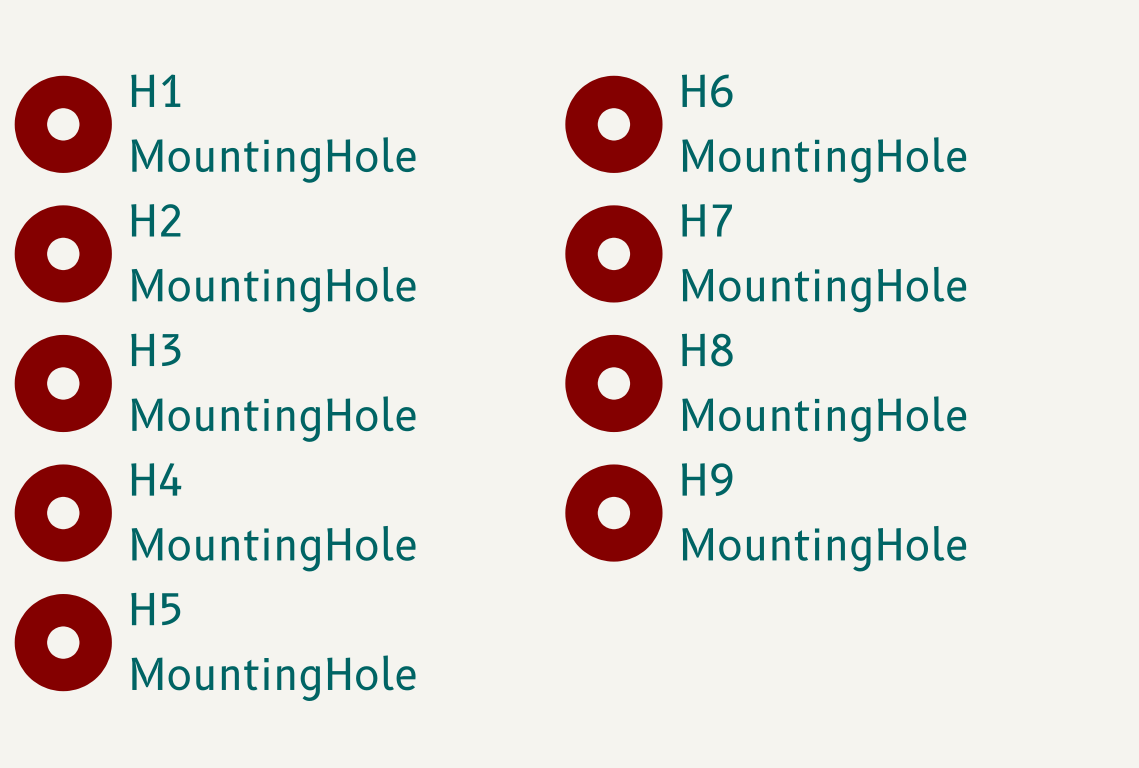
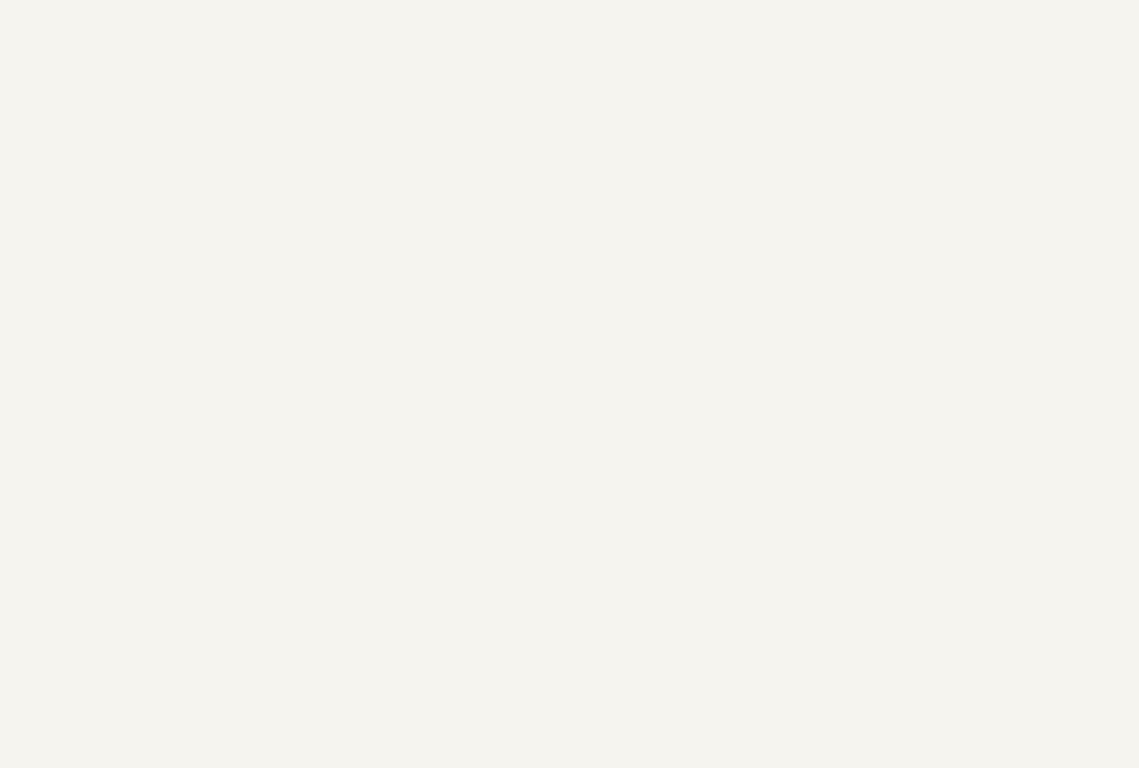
H1: MountingHole (63, 124) -> none
H6: MountingHole (613, 124) -> none
H2: MountingHole (63, 253) -> none
H7: MountingHole (613, 253) -> none
H3: MountingHole (63, 383) -> none
H8: MountingHole (613, 383) -> none
H4: MountingHole (63, 513) -> none
H9: MountingHole (613, 513) -> none
H5: MountingHole (63, 642) -> none

